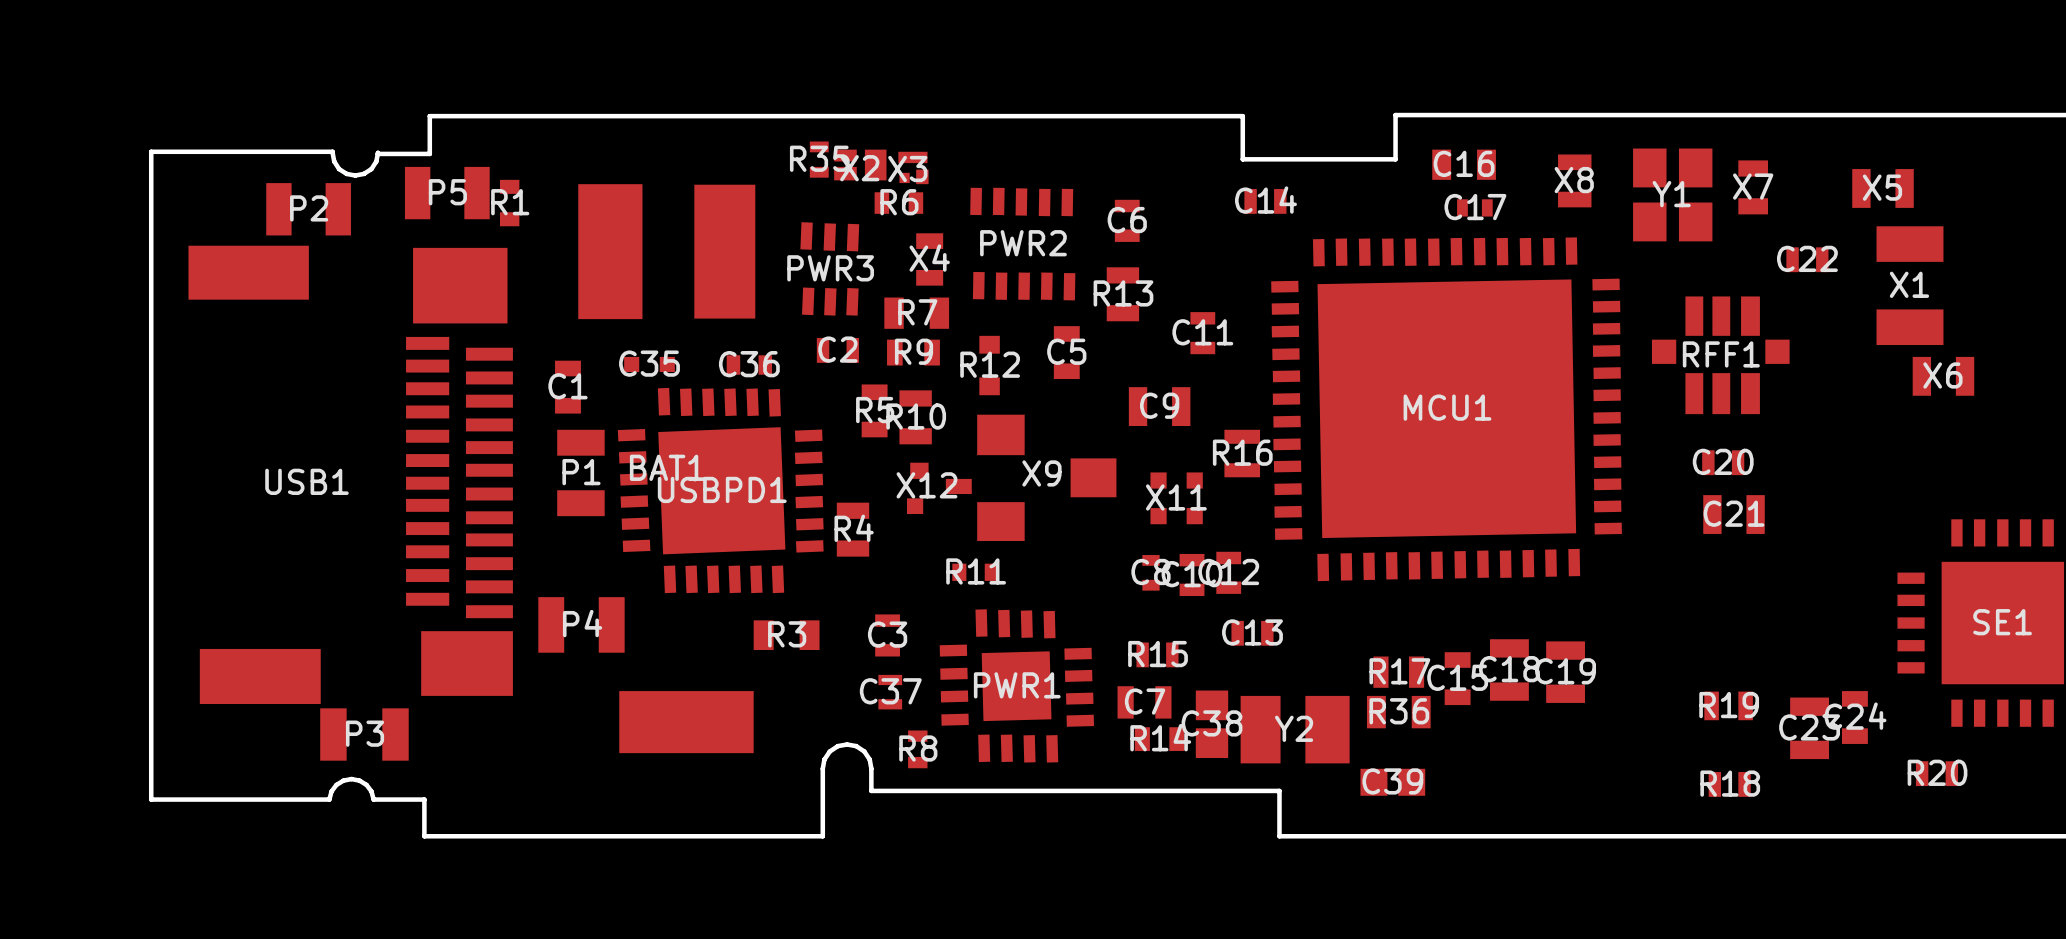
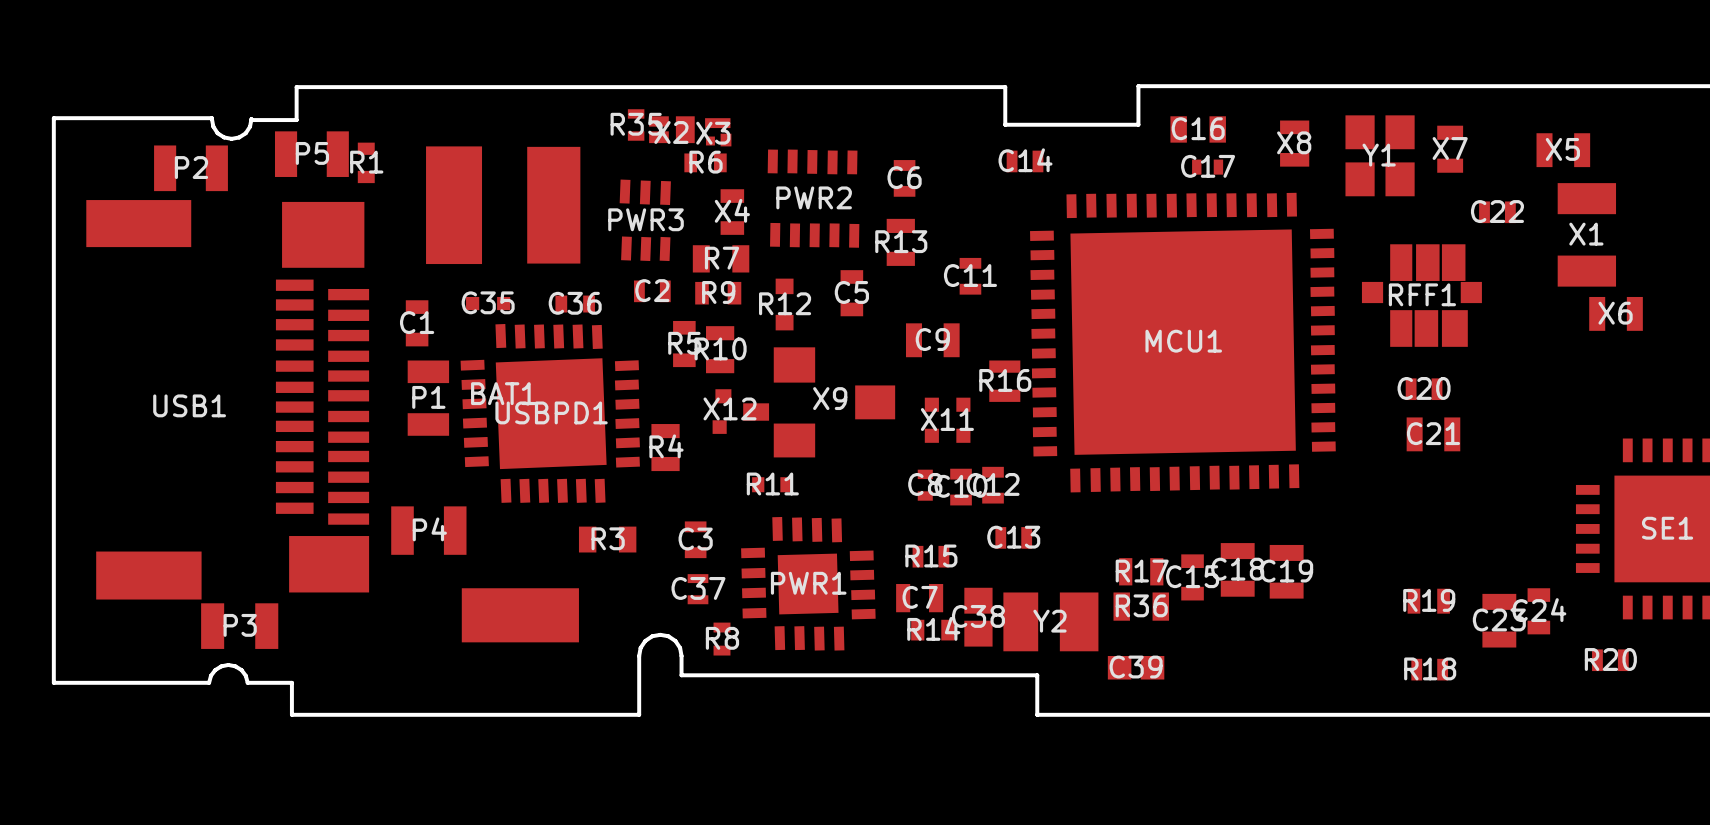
RFF1 footprint: [1651, 296, 1790, 415] -> [1361, 244, 1482, 347]
X12 footprint: [906, 462, 972, 514] -> [712, 389, 770, 434]

